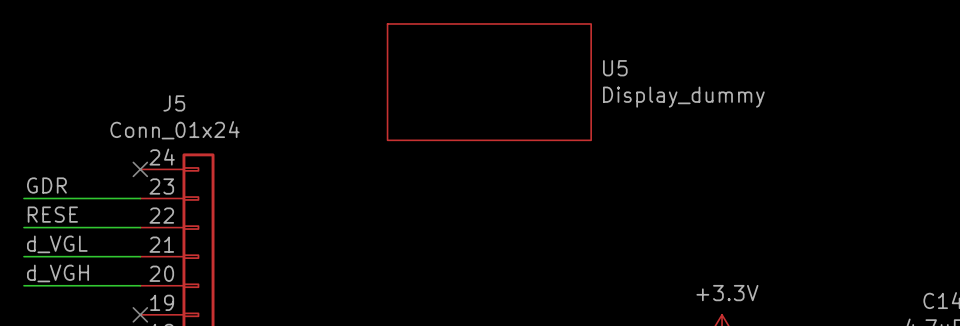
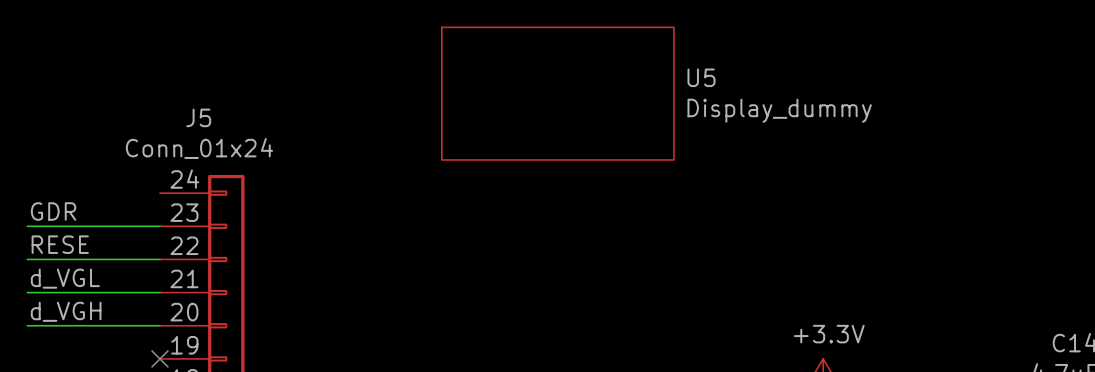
no-connect mark: (140, 169) -> none

